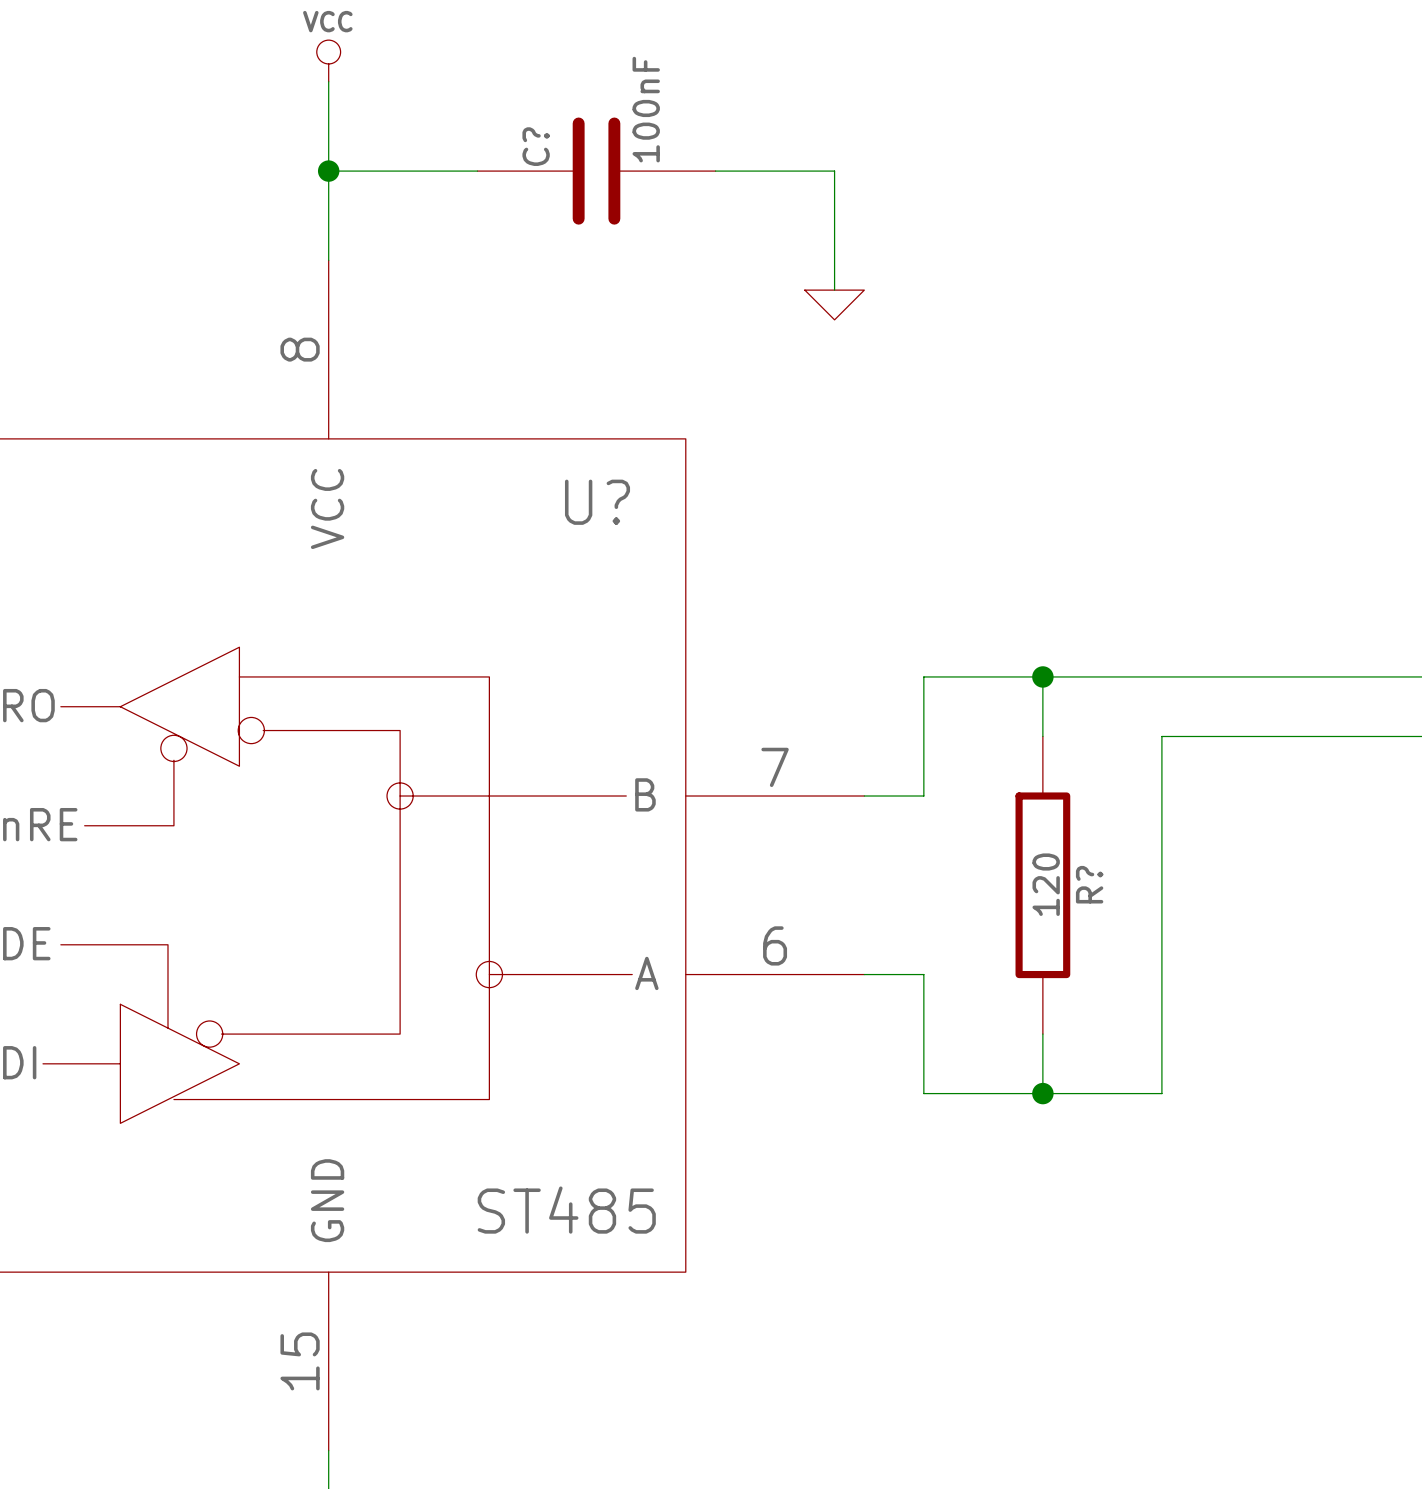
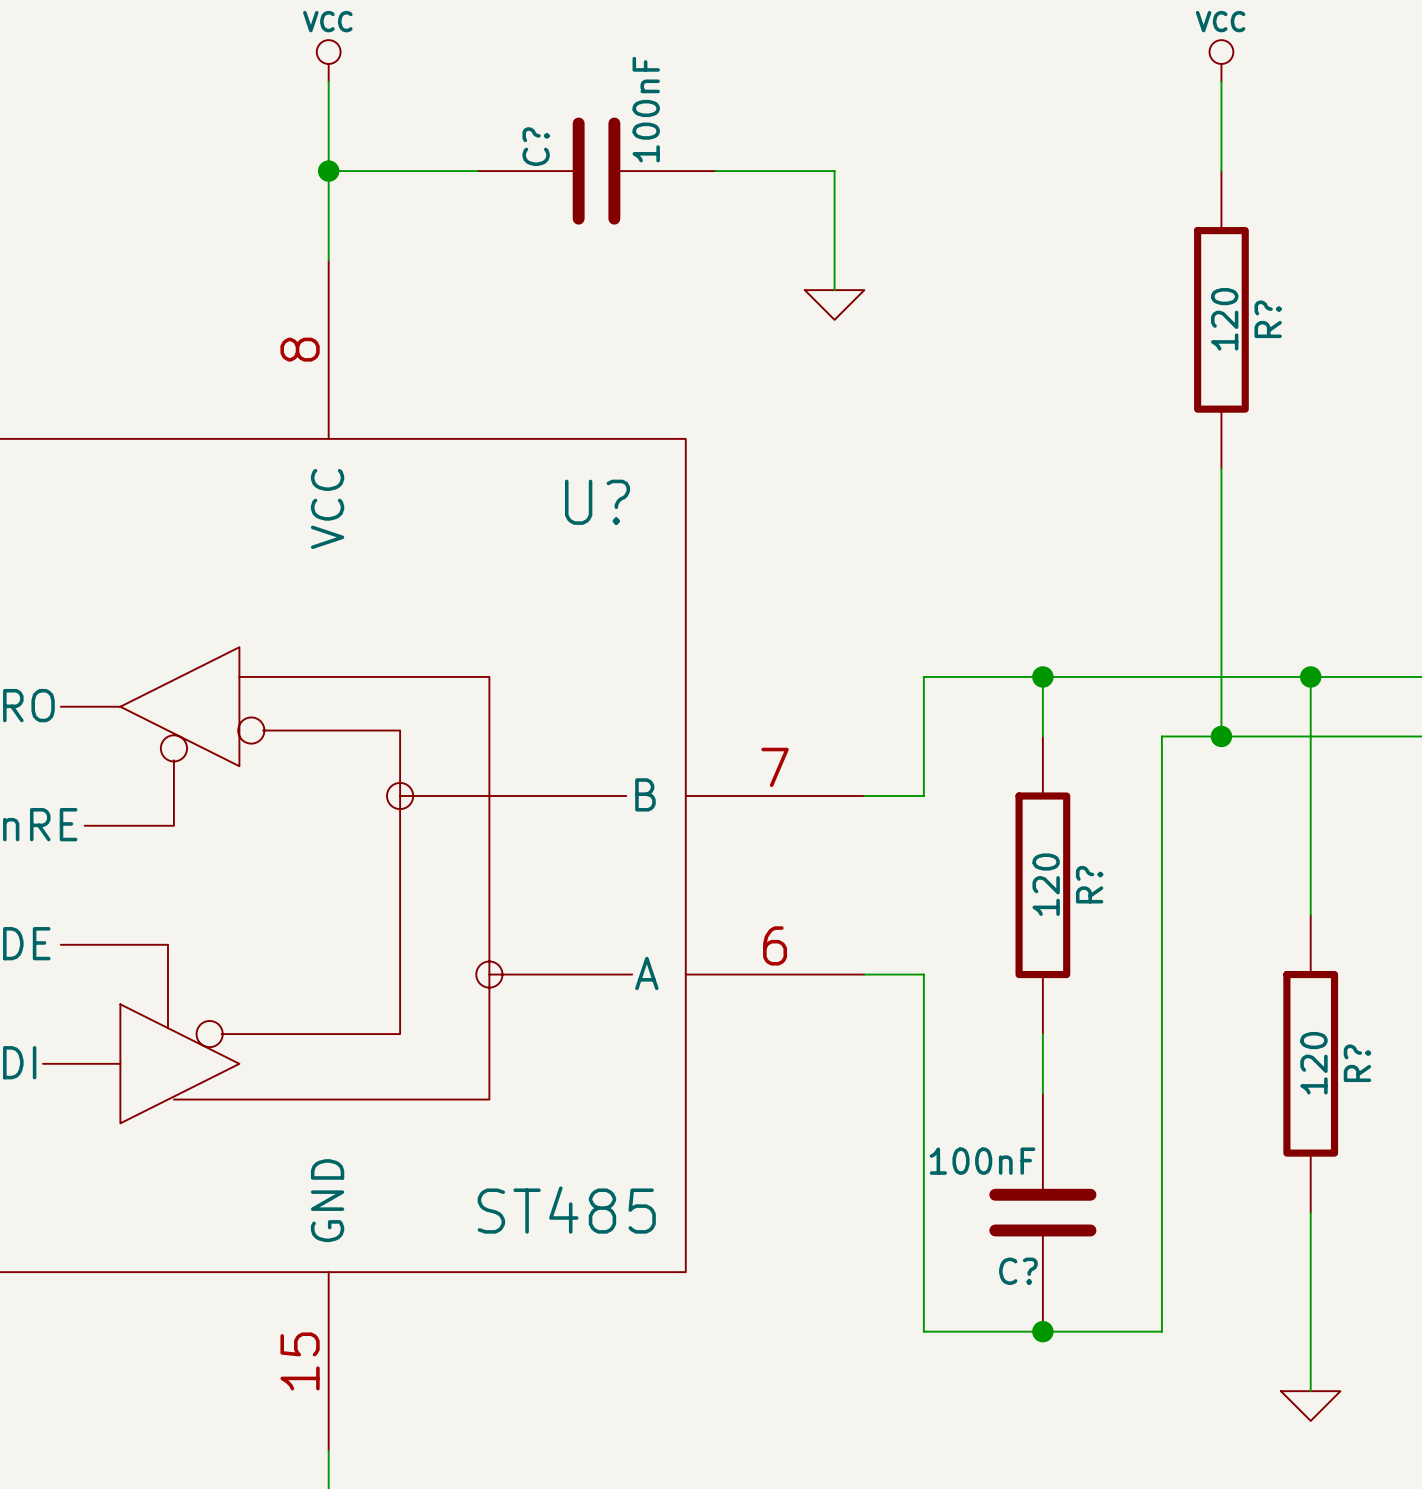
power symbol: none -> VCC (1221, 60)
wire: none -> (1221, 81) (1221, 171)
R?: none -> 120 (1221, 319)
wire: none -> (1221, 468) (1221, 736)
wire: none -> (1310, 676) (1310, 915)
junction: none -> (1310, 676)
junction: none -> (1221, 736)
R?: none -> 120 (1310, 1063)
wire: (923, 1093) (1161, 1093) -> (923, 1093) (923, 1331) (1161, 1331) (1161, 1093)
junction: (1042, 1093) -> none
C?: none -> 100nF (1042, 1212)
wire: none -> (1310, 1212) (1310, 1391)
junction: none -> (1042, 1331)
power symbol: none -> (1310, 1406)

